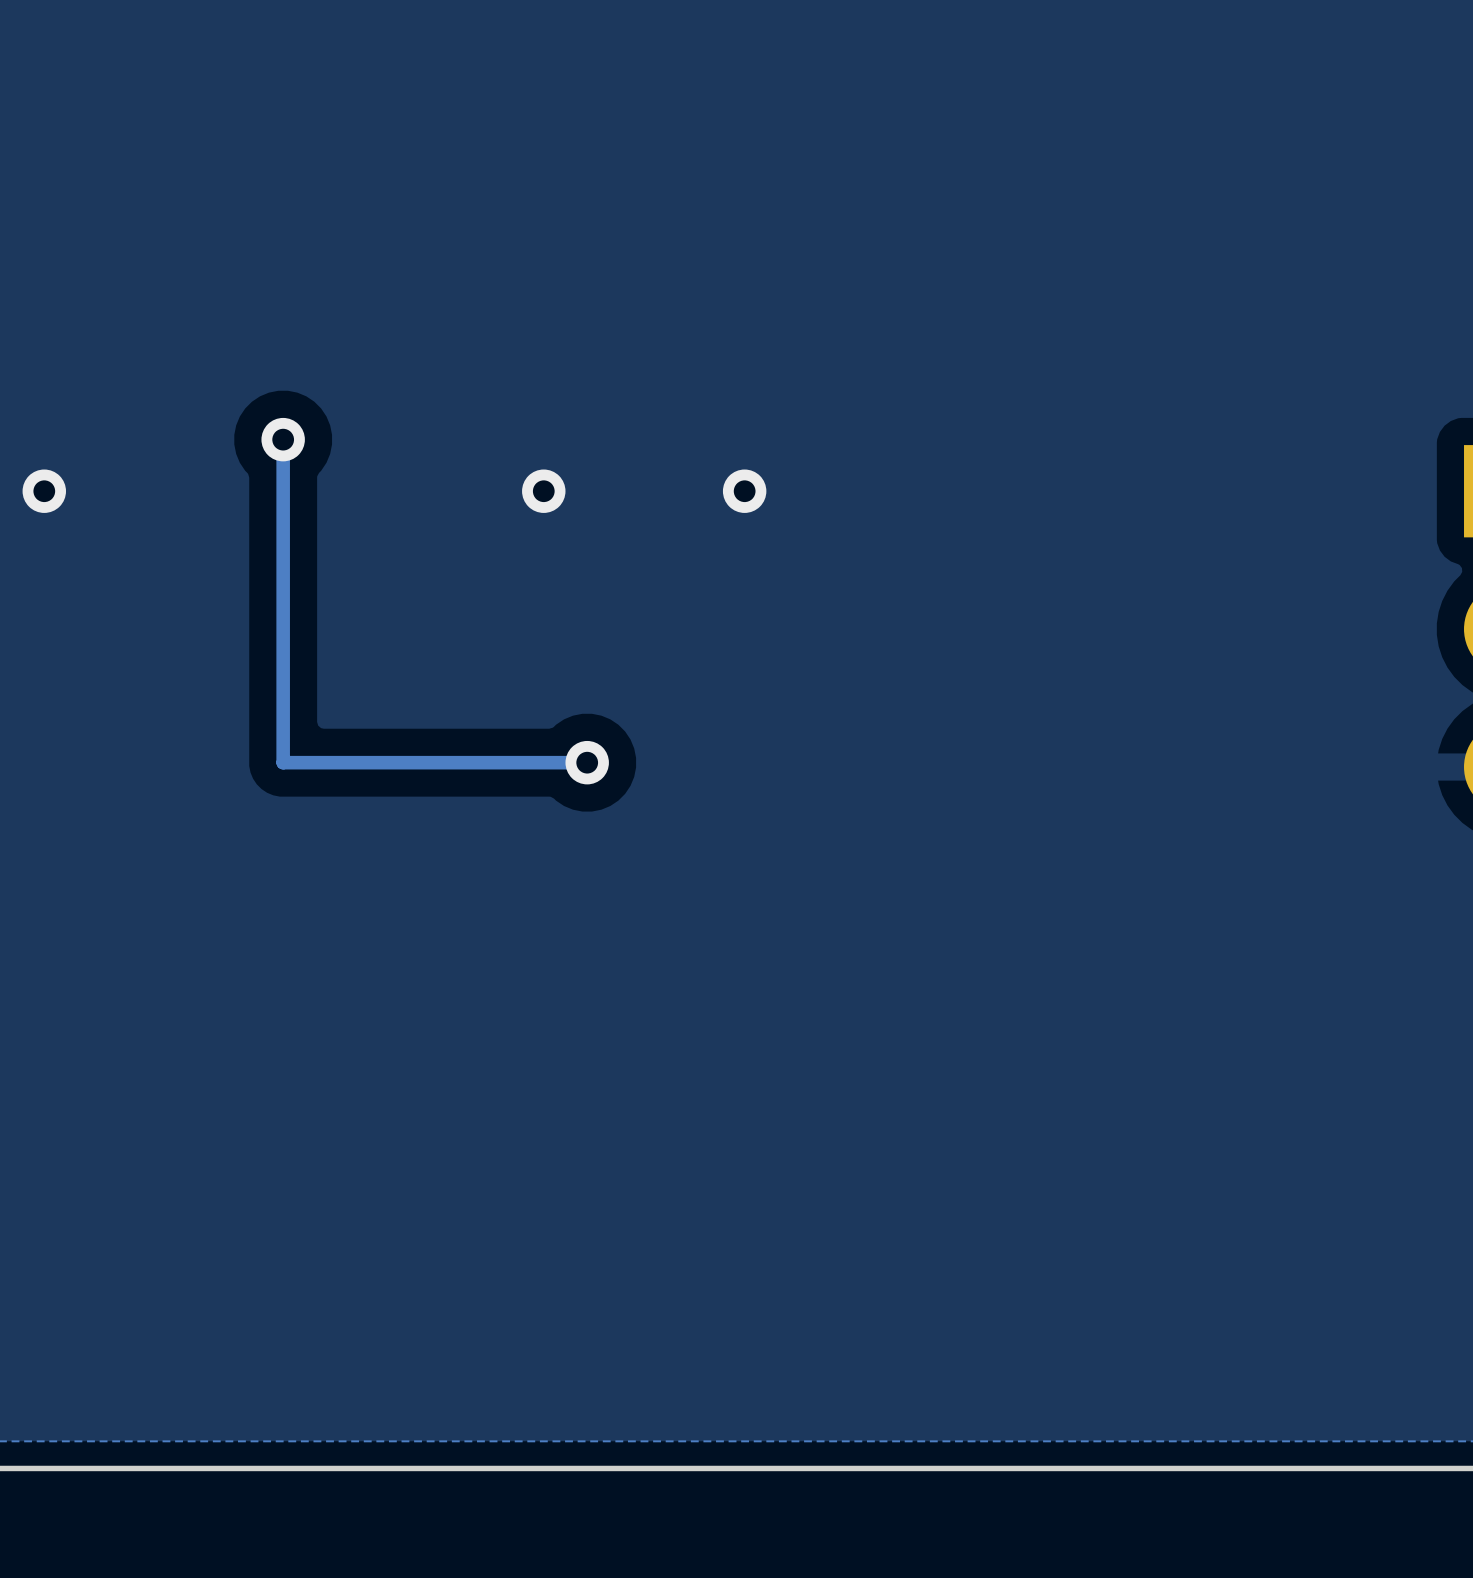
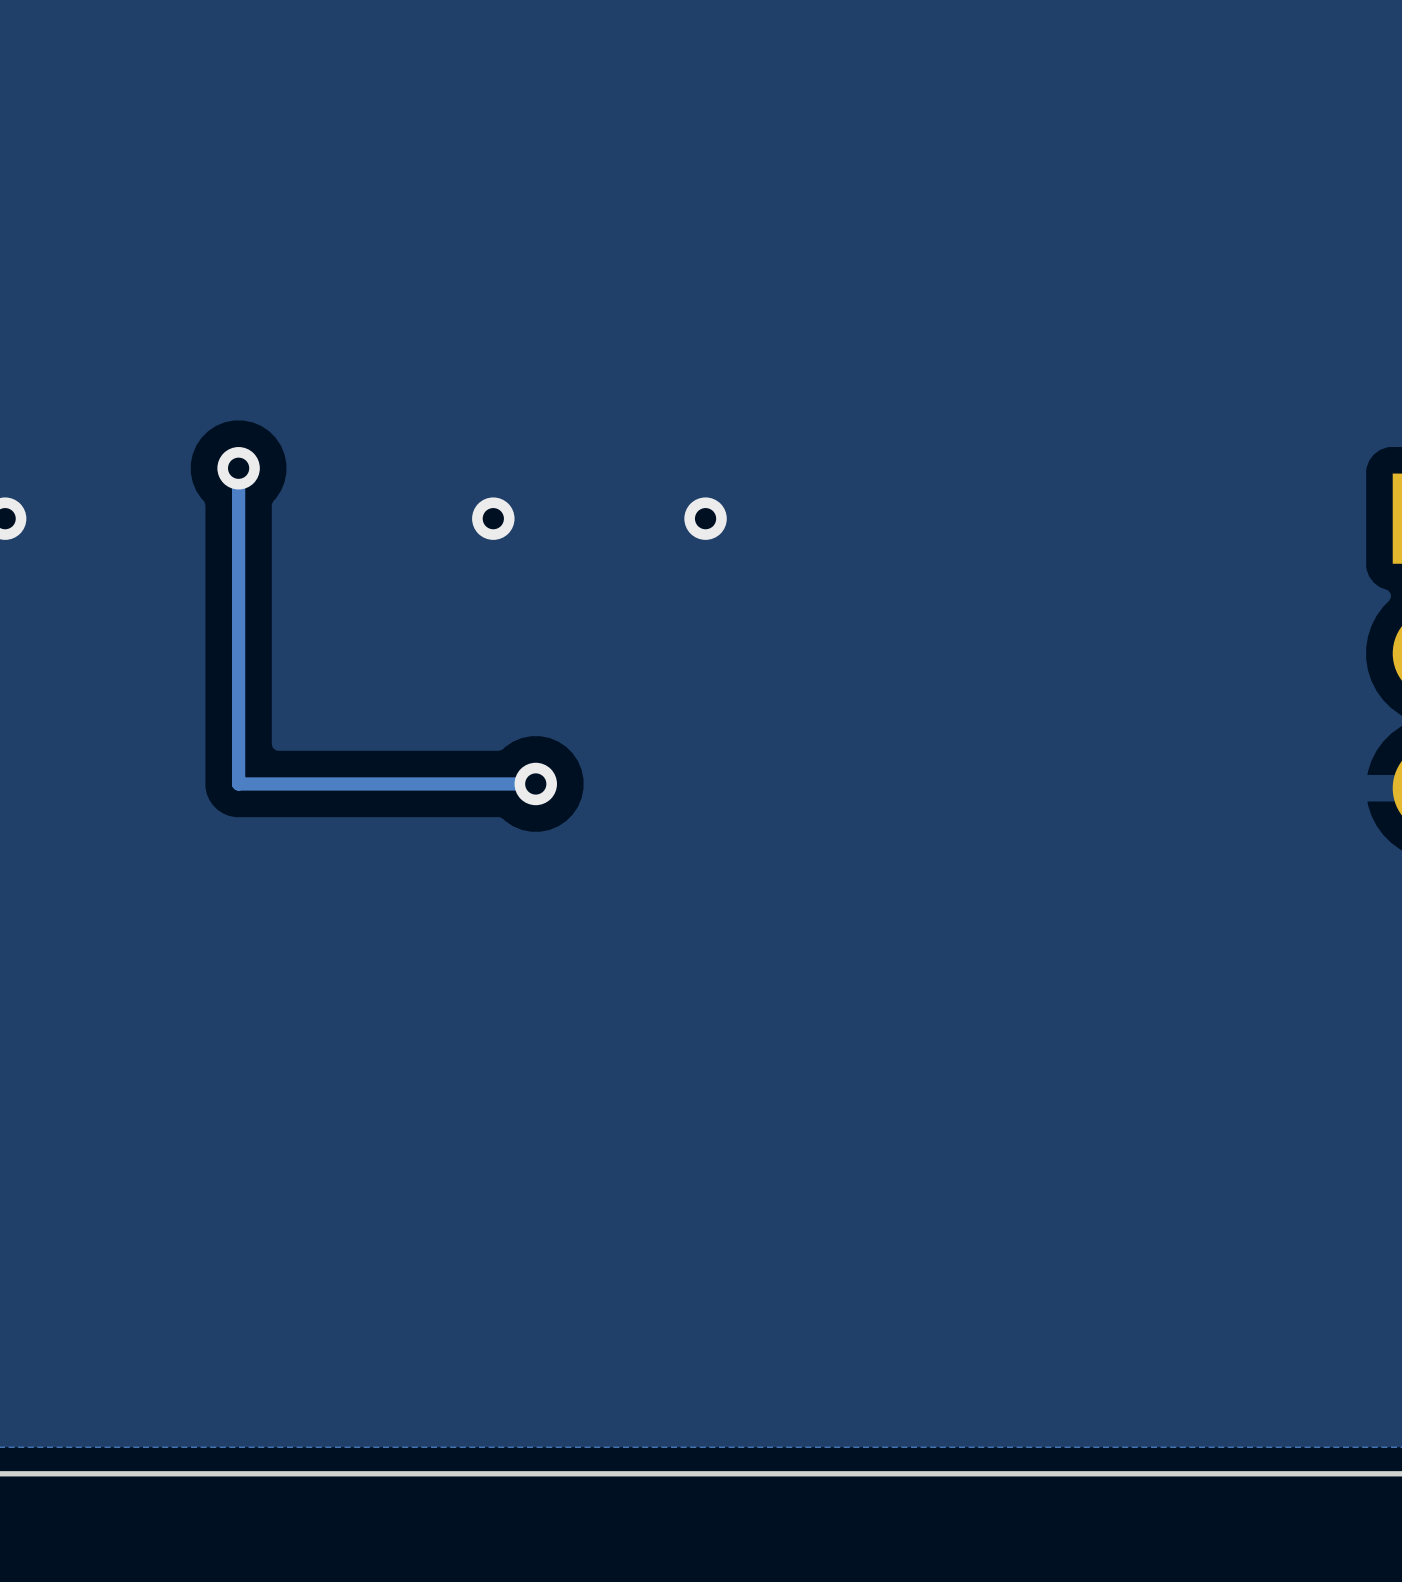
via position: (744, 491) -> (705, 518)

